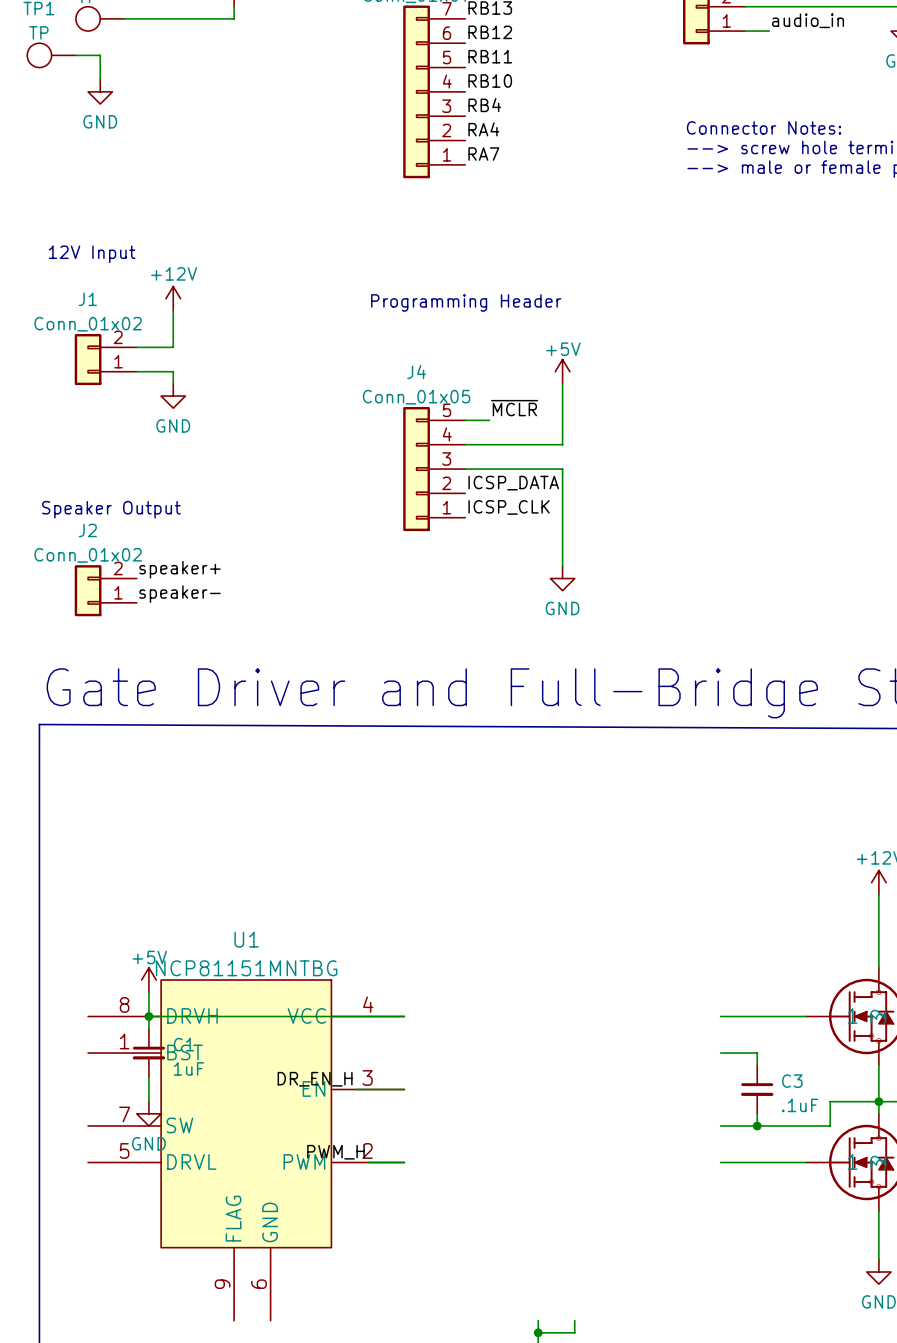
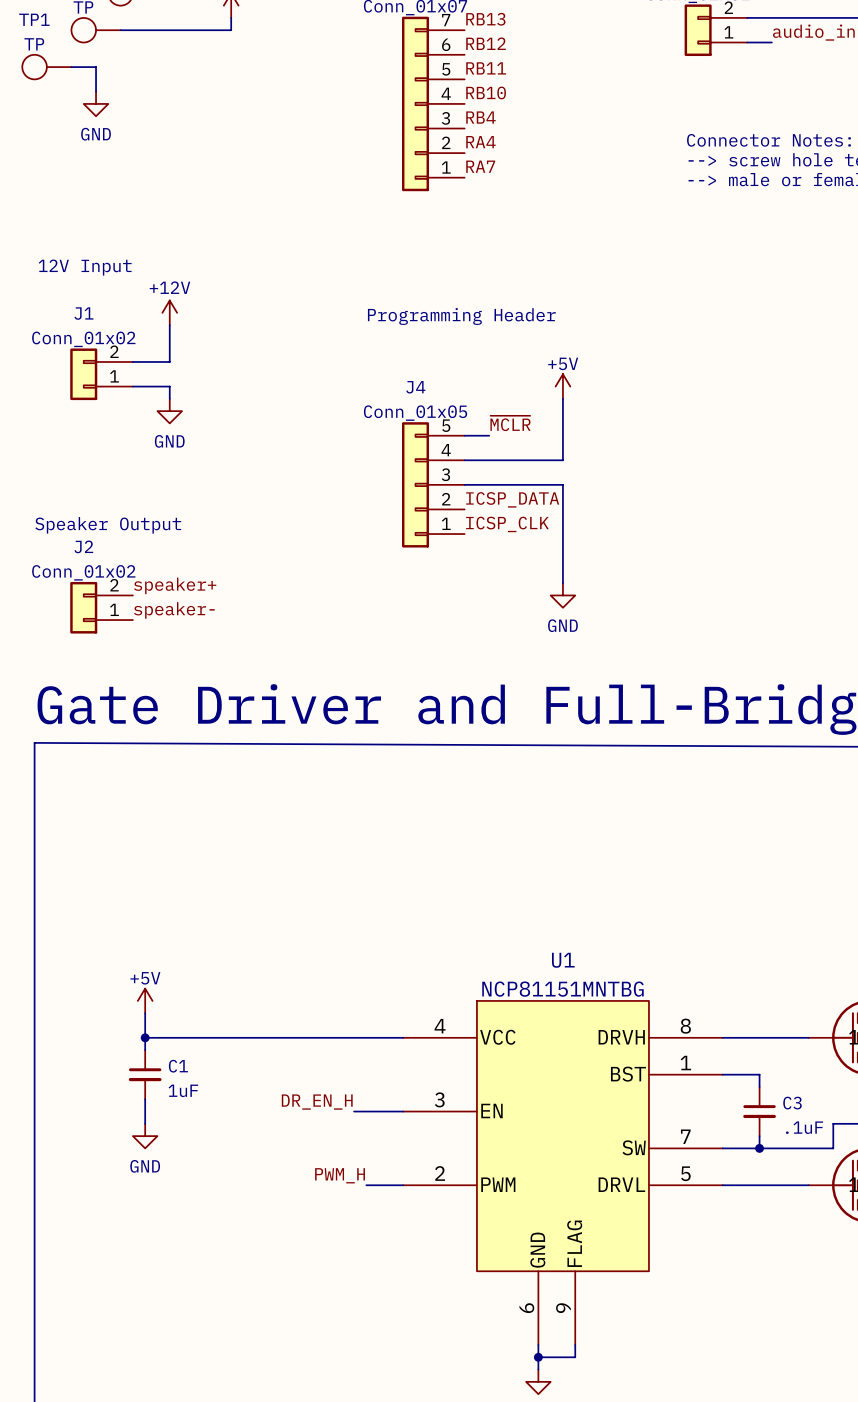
U1 flip: as is (246, 1113) -> left-right (562, 1136)
U1 position: (246, 1149) -> (562, 1172)

